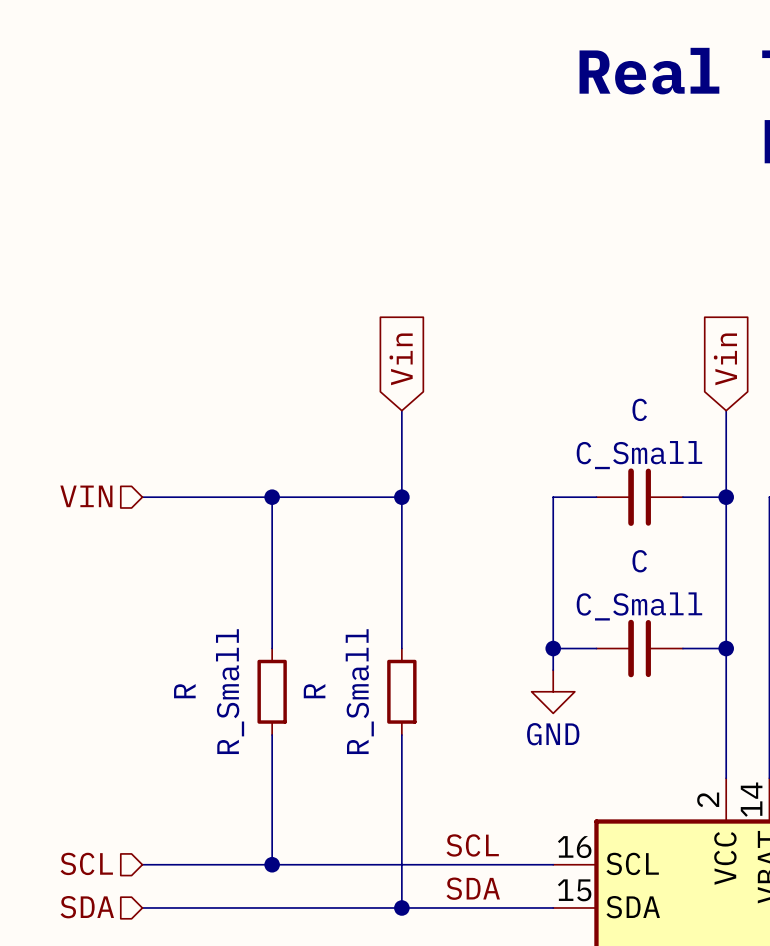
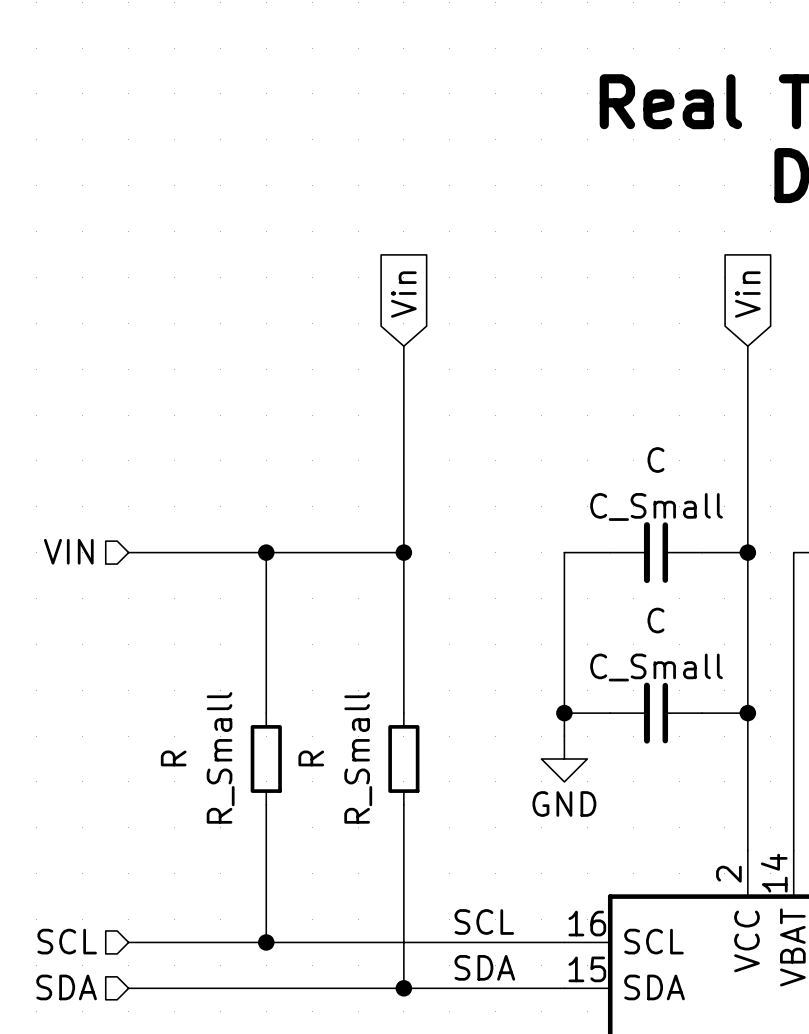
wire: none -> (403, 346) (403, 460)
wire: none -> (747, 346) (747, 460)
global label position: Vin (401, 359) -> Vin (403, 294)
global label position: Vin (725, 359) -> Vin (747, 294)

